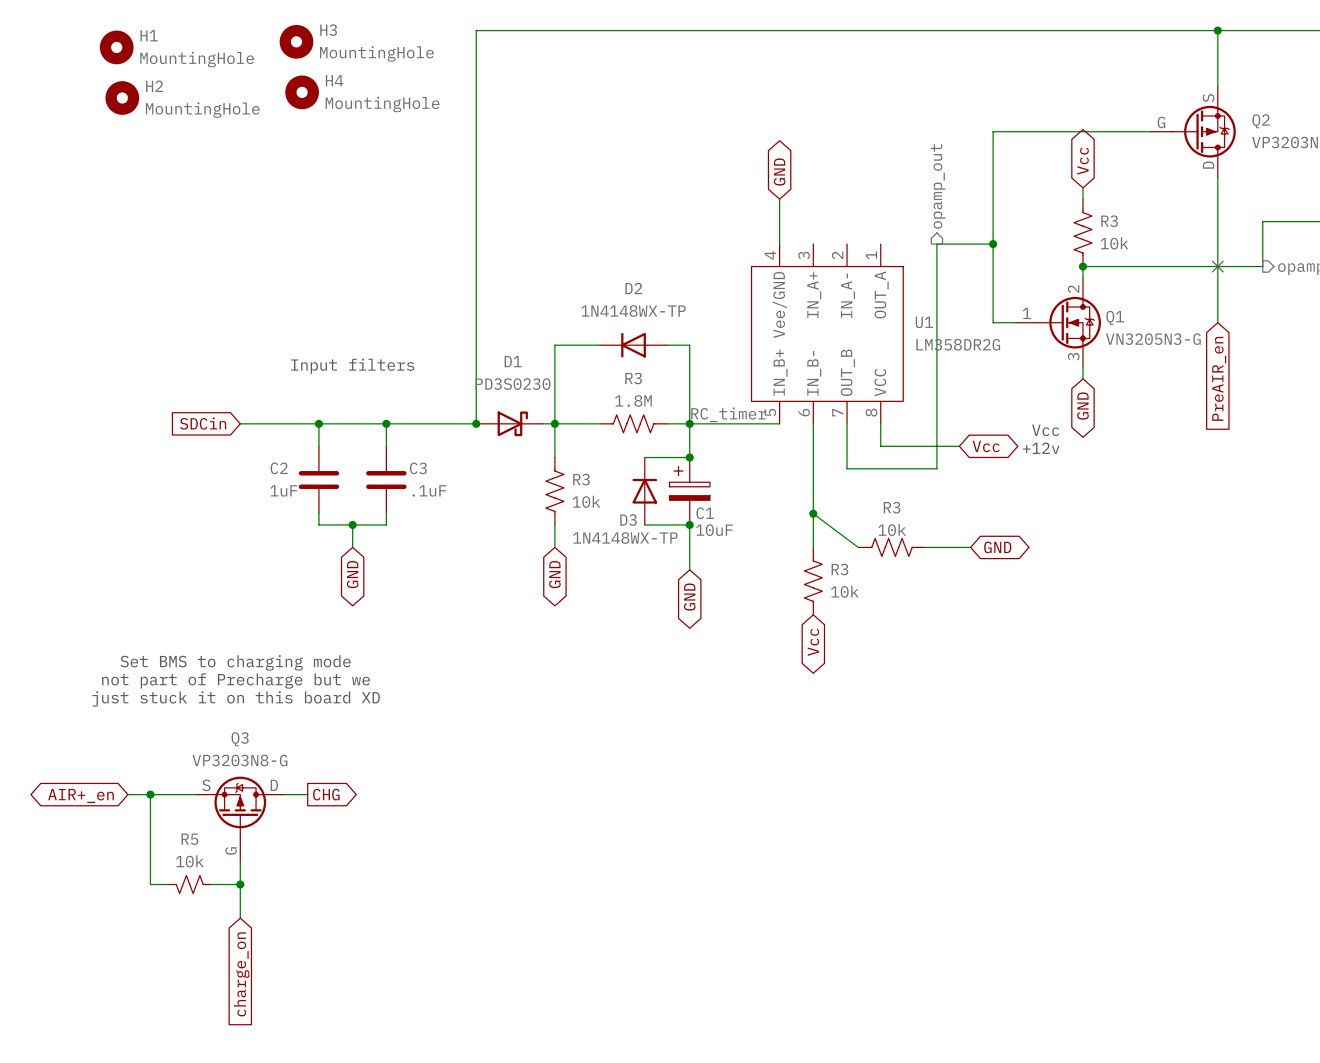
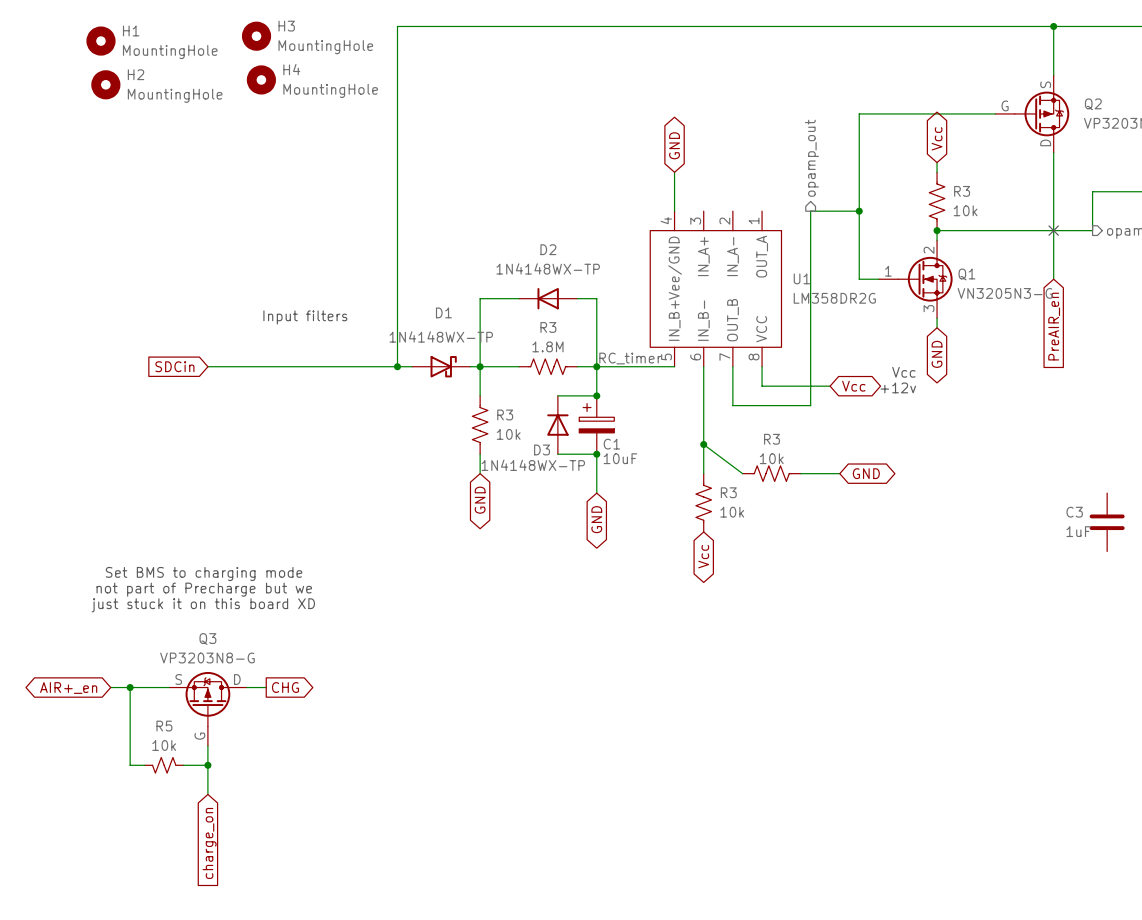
wire: (476, 30) (476, 423) -> (412, 26) (397, 26) (397, 366)
D1 value: PD3S0230 (513, 384) -> 1N4148WX-TP (441, 336)
wire: (318, 423) (318, 446) -> none
junction: (318, 423) -> none
wire: (386, 423) (386, 446) -> none
junction: (386, 423) -> none
junction position: (476, 423) -> (397, 366)
C3 name position: C3 (418, 468) -> C3 (1074, 512)
C2: 1uF (318, 480) -> none
C3 position: (386, 480) -> (1107, 522)
C3 value: .1uF (429, 490) -> 1uF (1078, 531)
wire: (318, 513) (318, 524) (386, 524) (386, 513) -> none
wire: (352, 524) (352, 547) -> none
junction: (352, 524) -> none
global label: GND (352, 574) -> none

